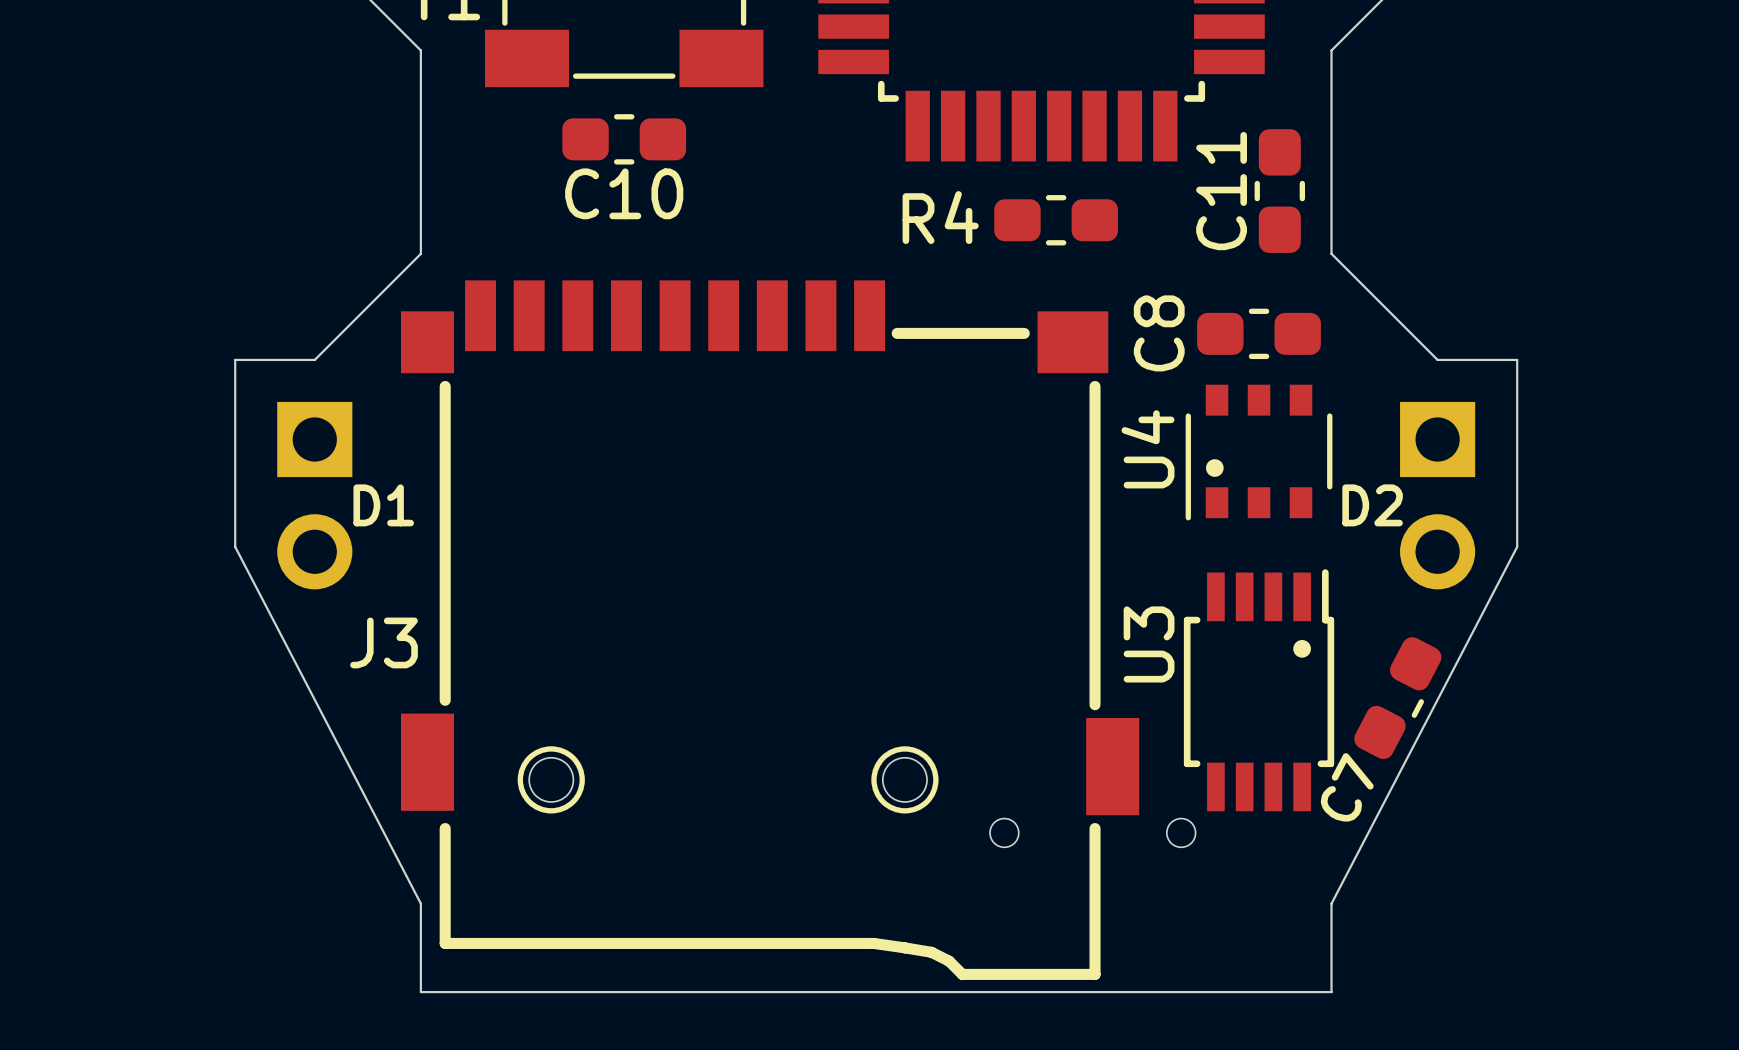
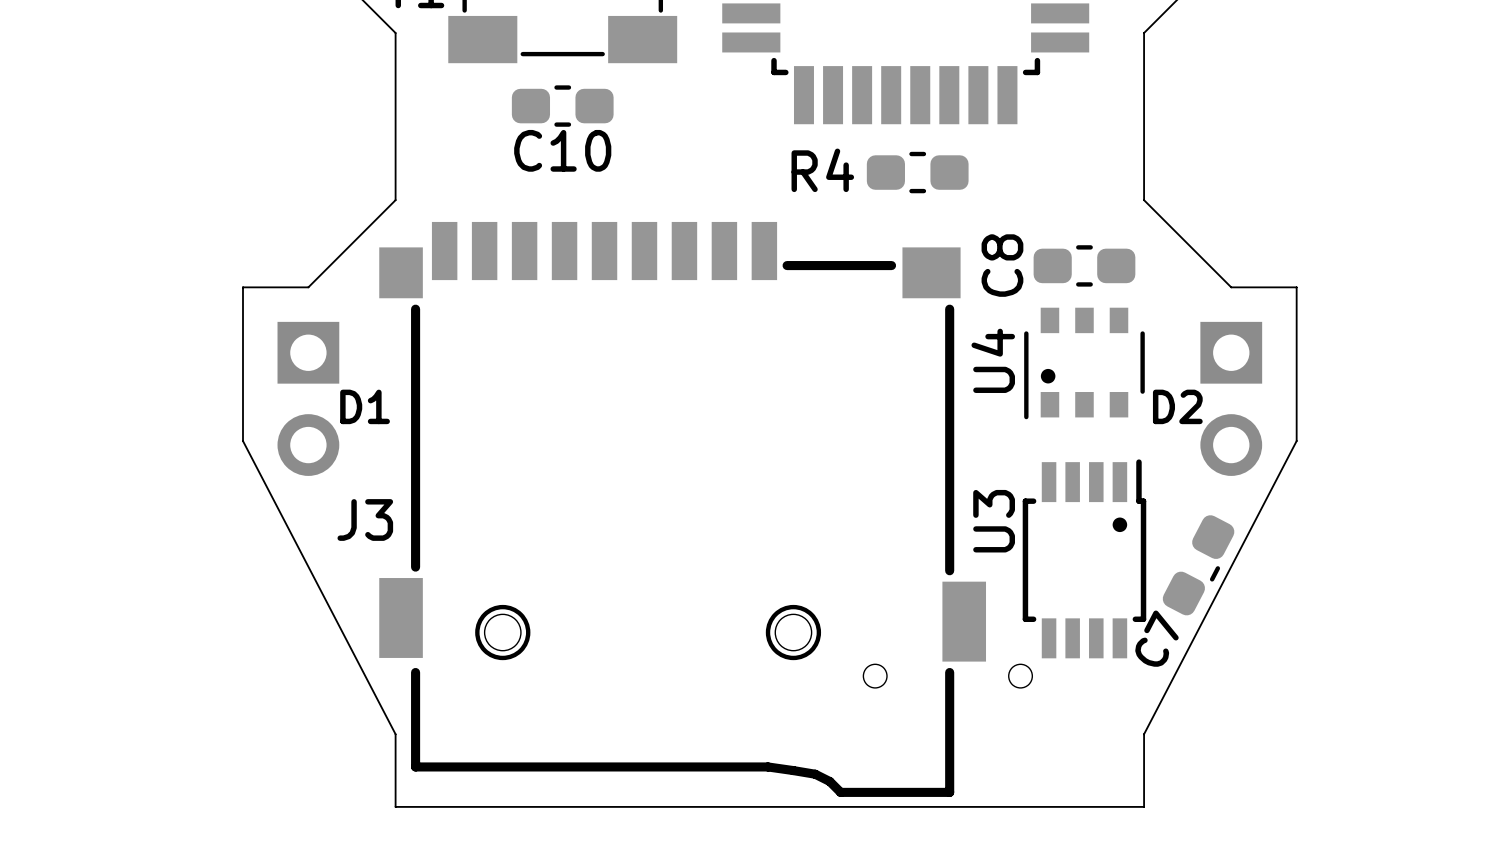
C11: (1279, 191) -> none

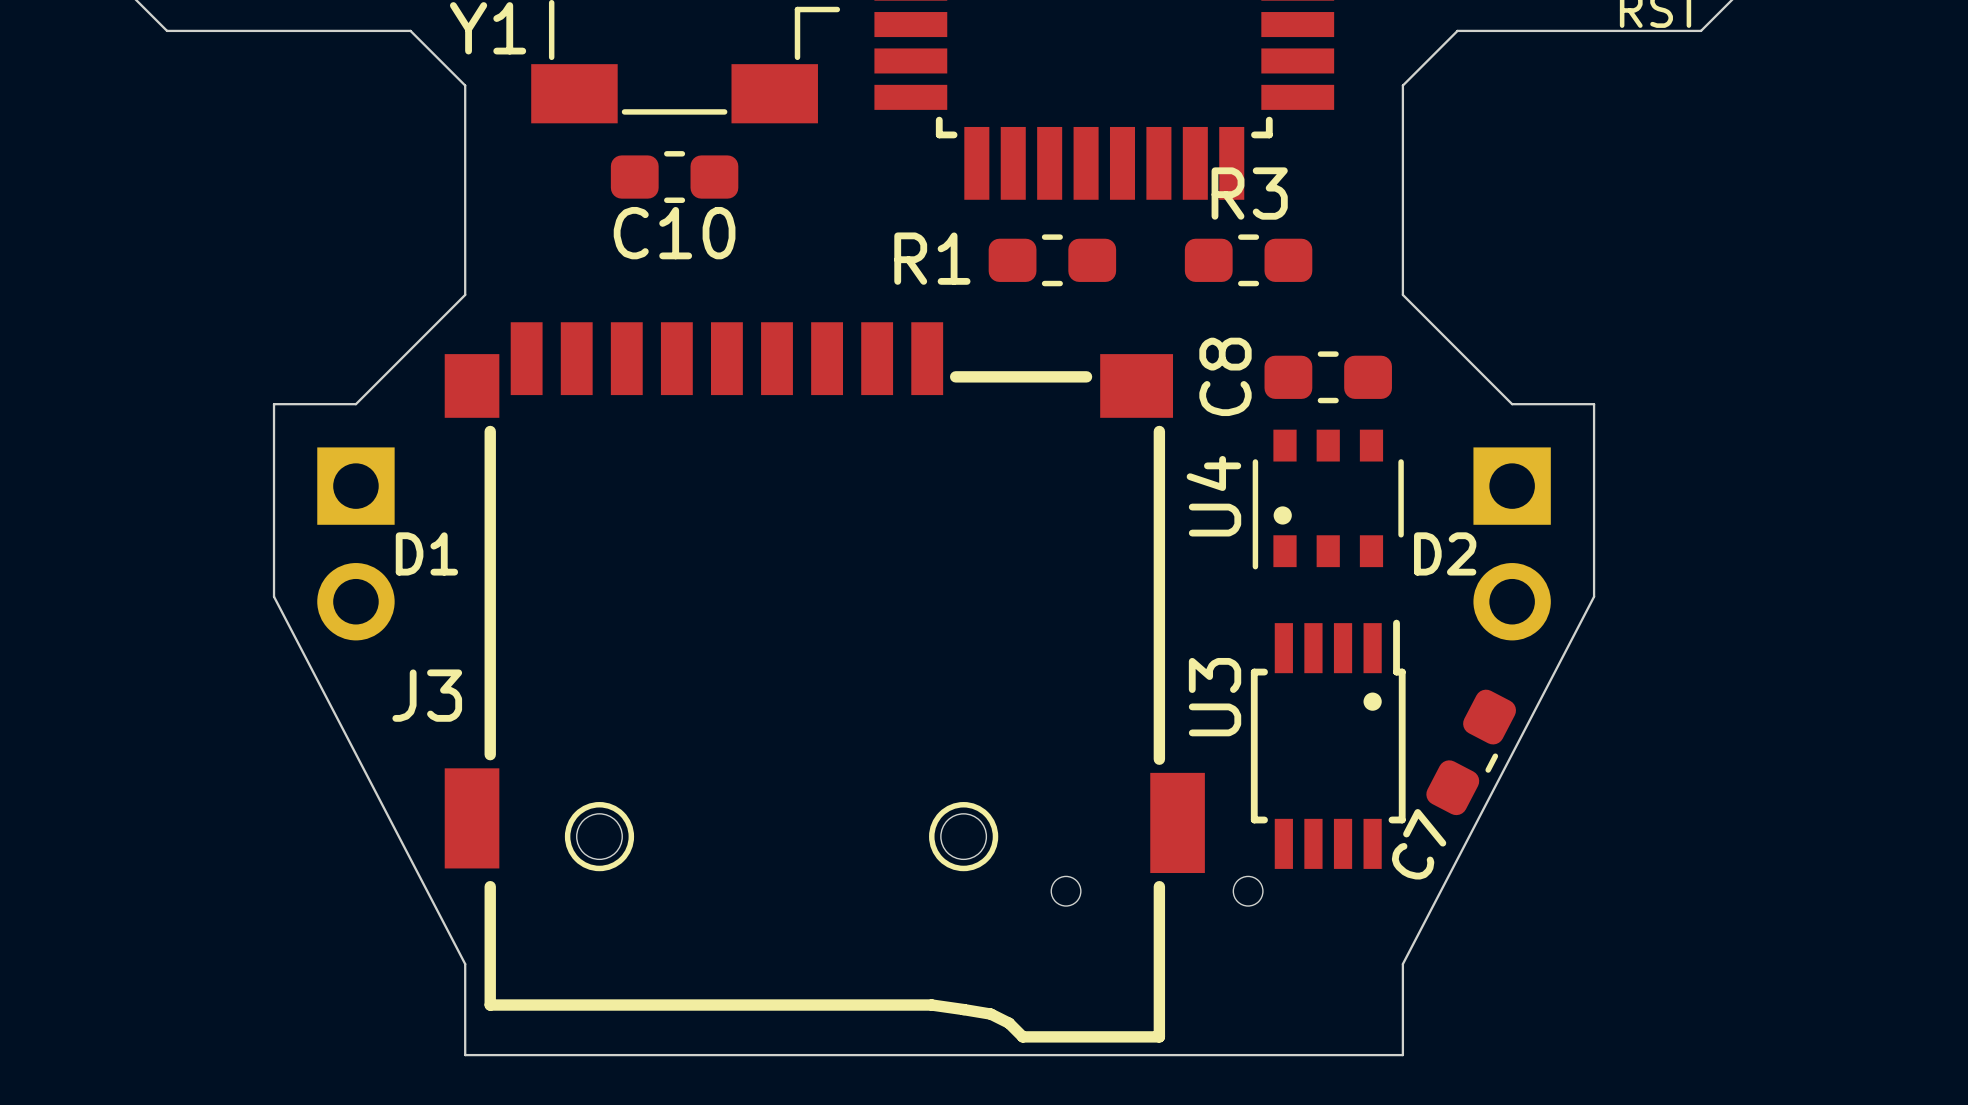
R1: none -> (1052, 260)
R4: (917, 172) -> none
R3: none -> (1248, 260)

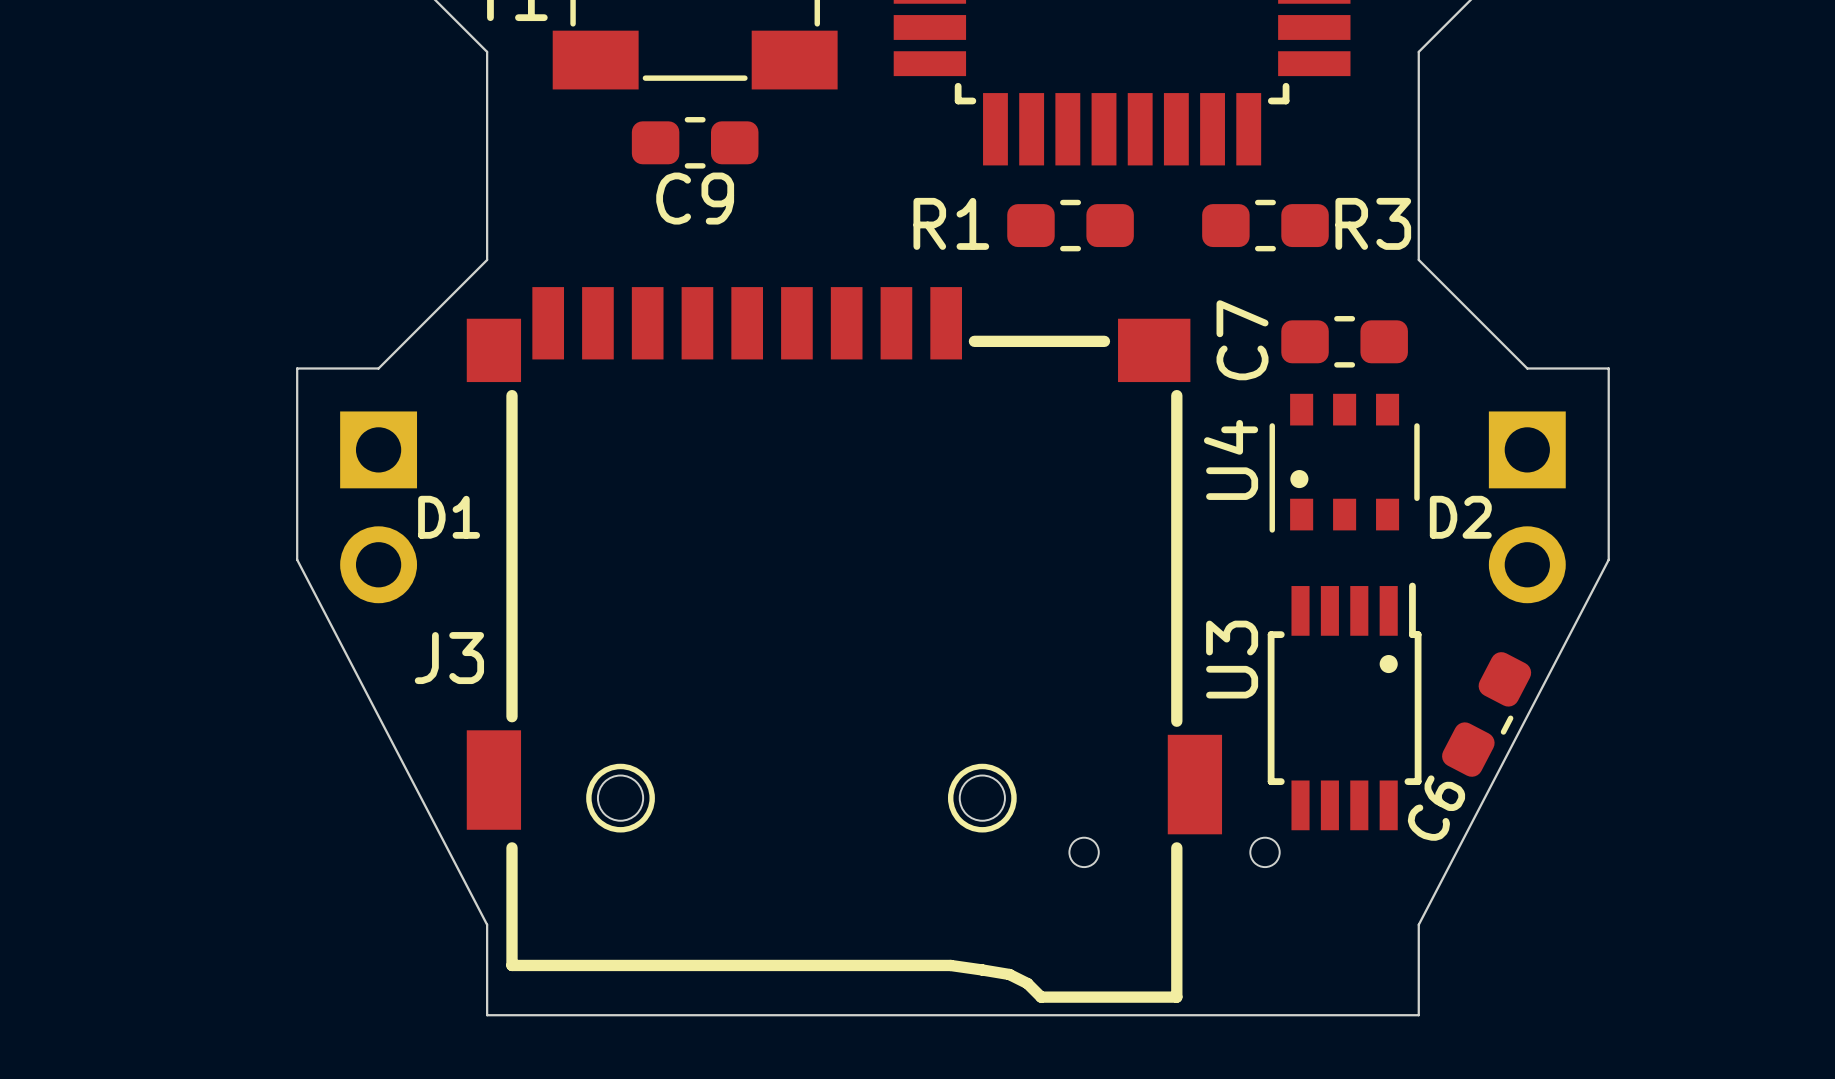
R3 name position: R3 (1249, 193) -> R3 (1373, 223)
C10 name: C10 (674, 233) -> C9 (695, 198)
C8 name: C8 (1225, 376) -> C7 (1242, 340)
C7 name: C7 (1419, 844) -> C6 (1436, 808)

